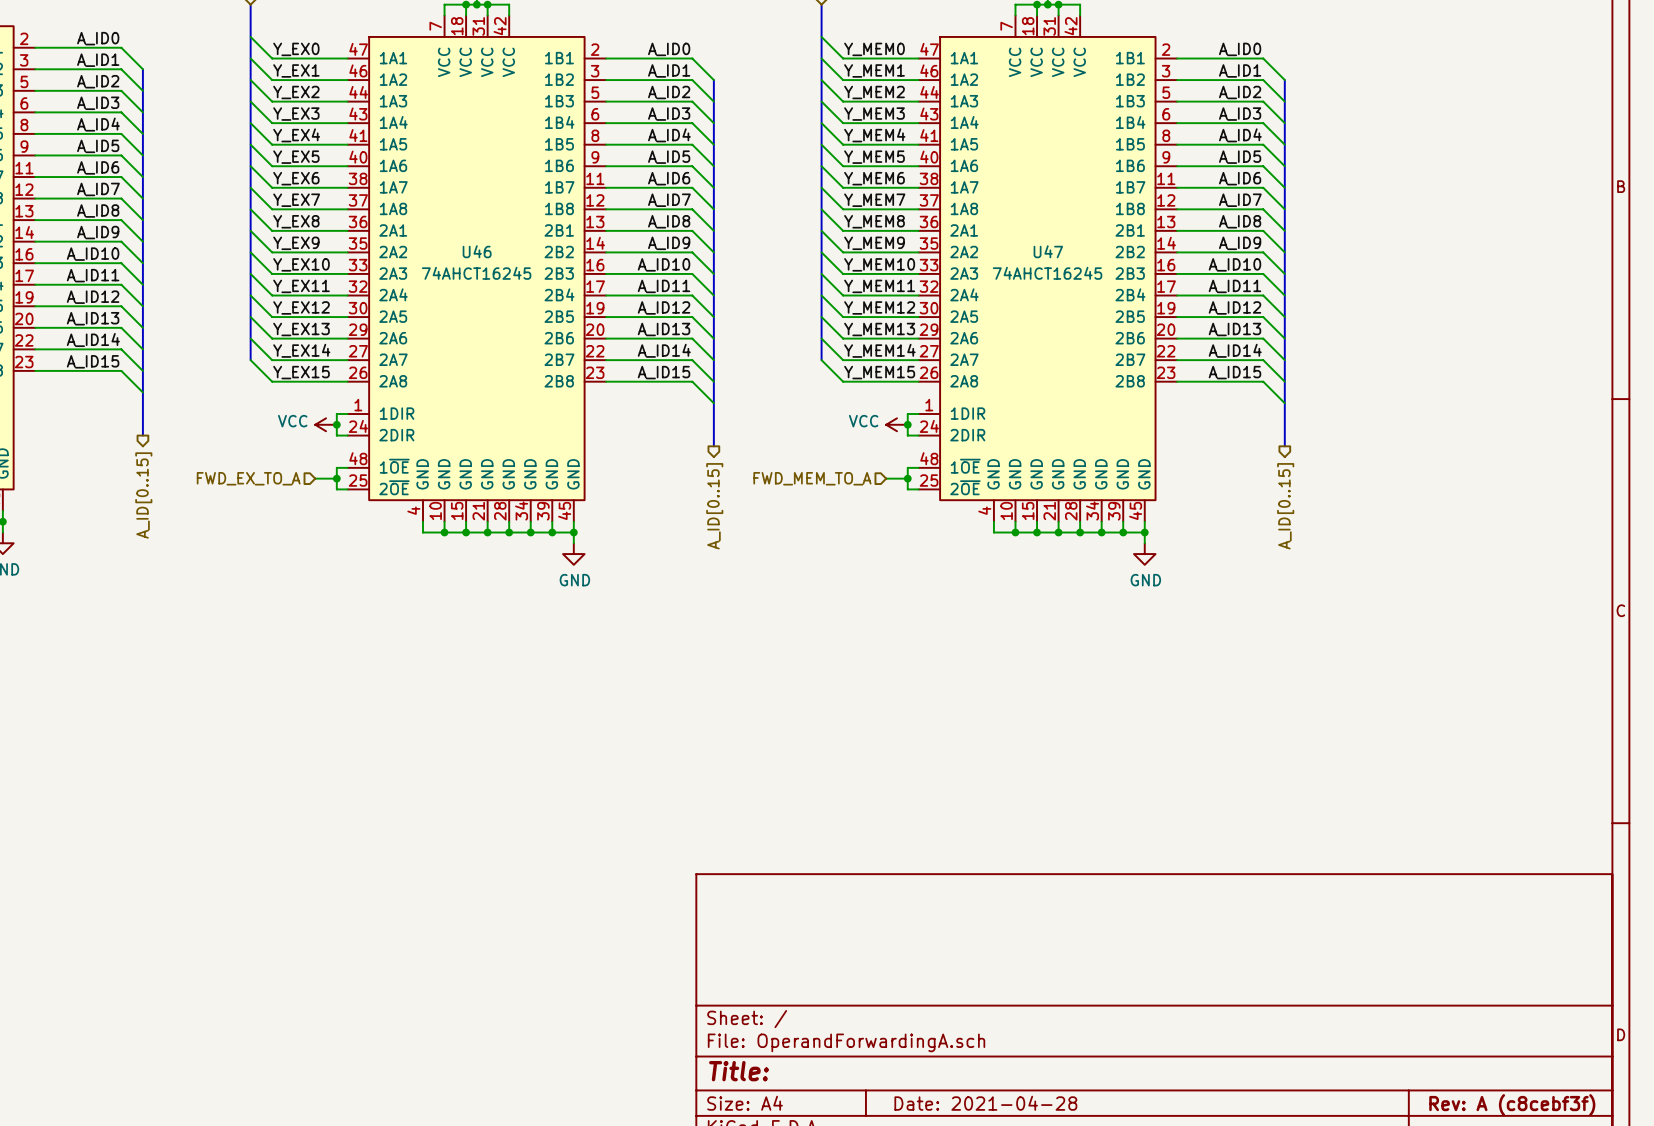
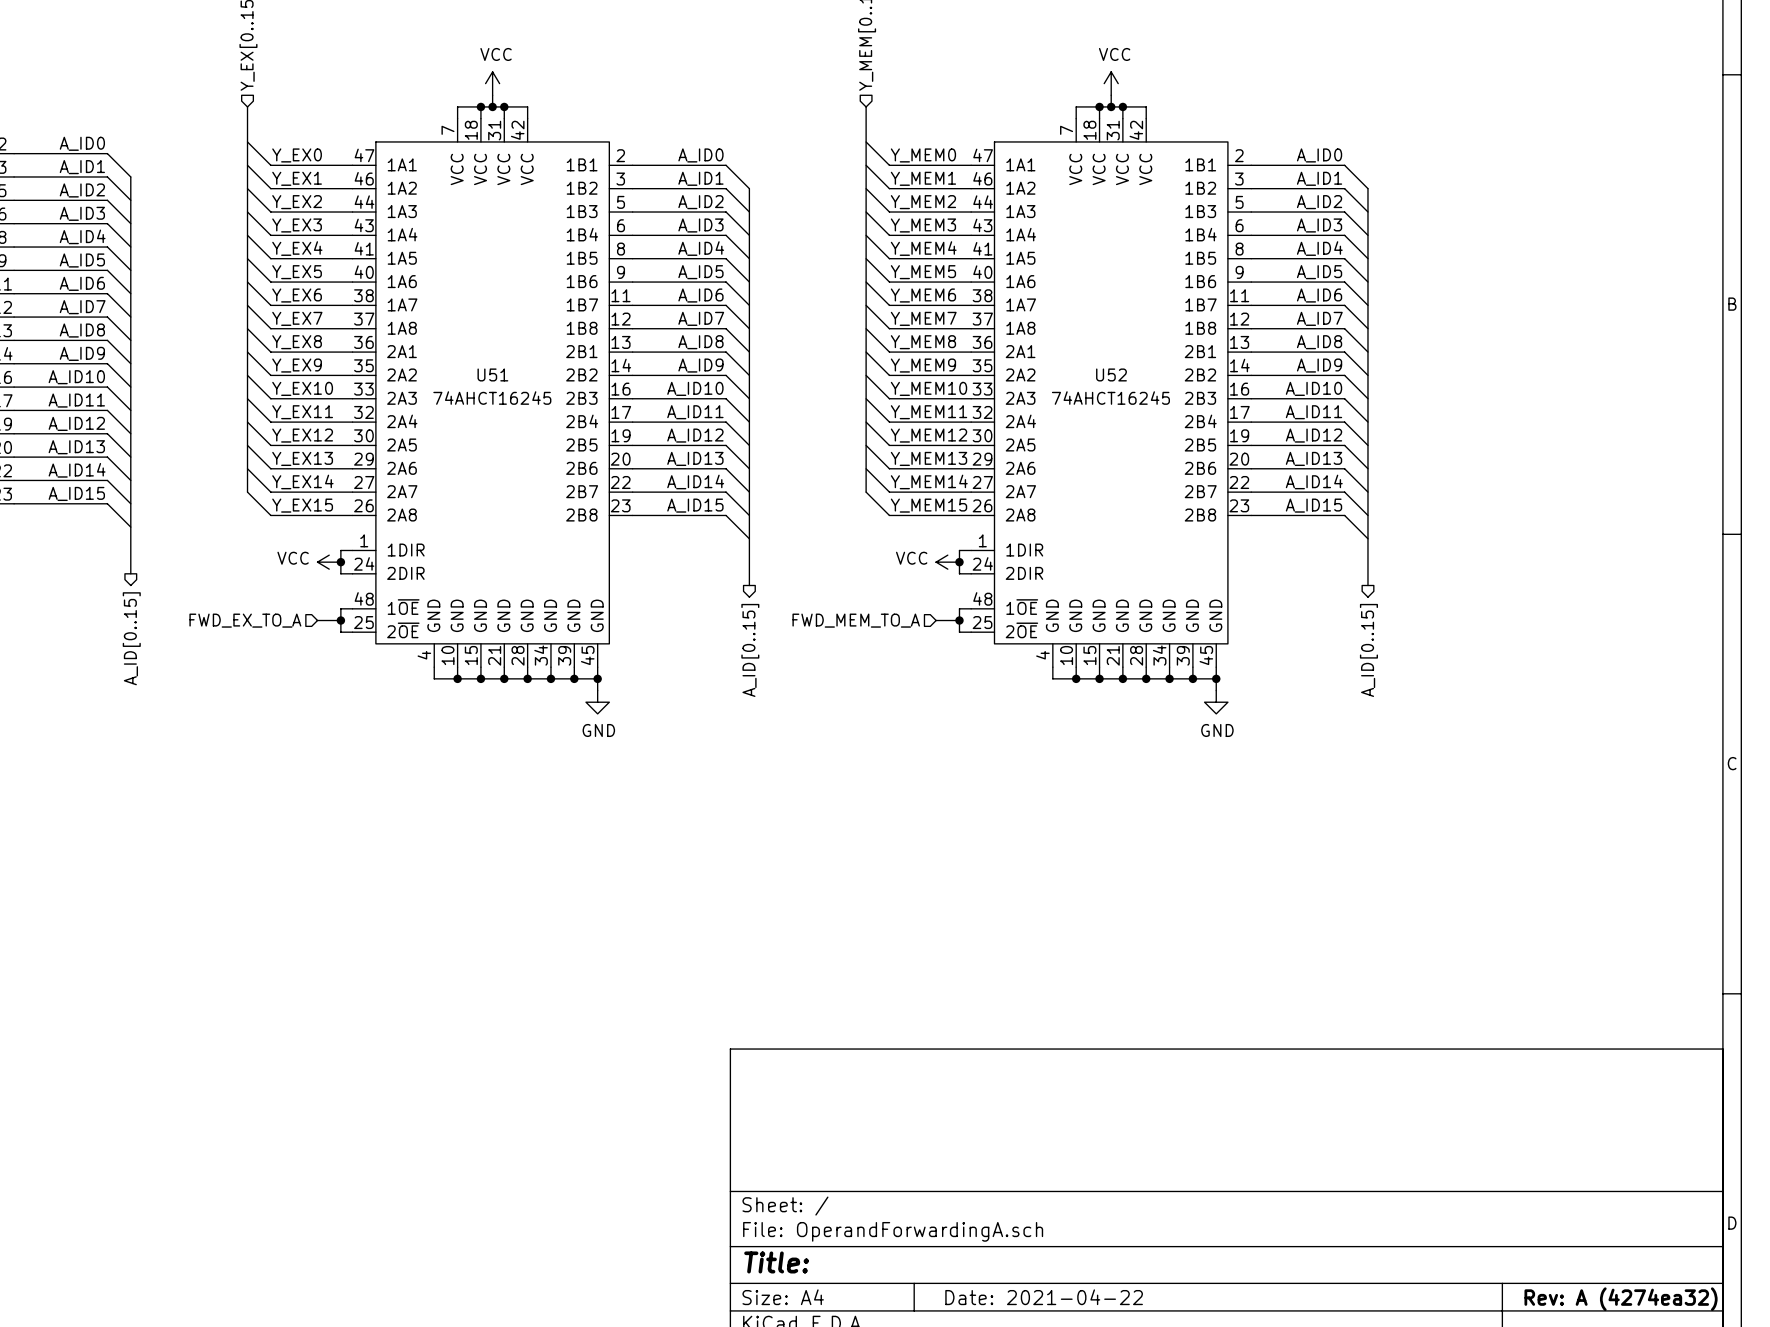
U46 name: U46 (477, 251) -> U51 (492, 374)
U47 name: U47 (1048, 251) -> U52 (1111, 374)
title block: Date: 2021-04-28 (985, 1103) -> Date: 2021-04-22 (1044, 1297)
title block: Rev: A (c8cebf3f) (1512, 1105) -> Rev: A (4274ea32) (1621, 1299)

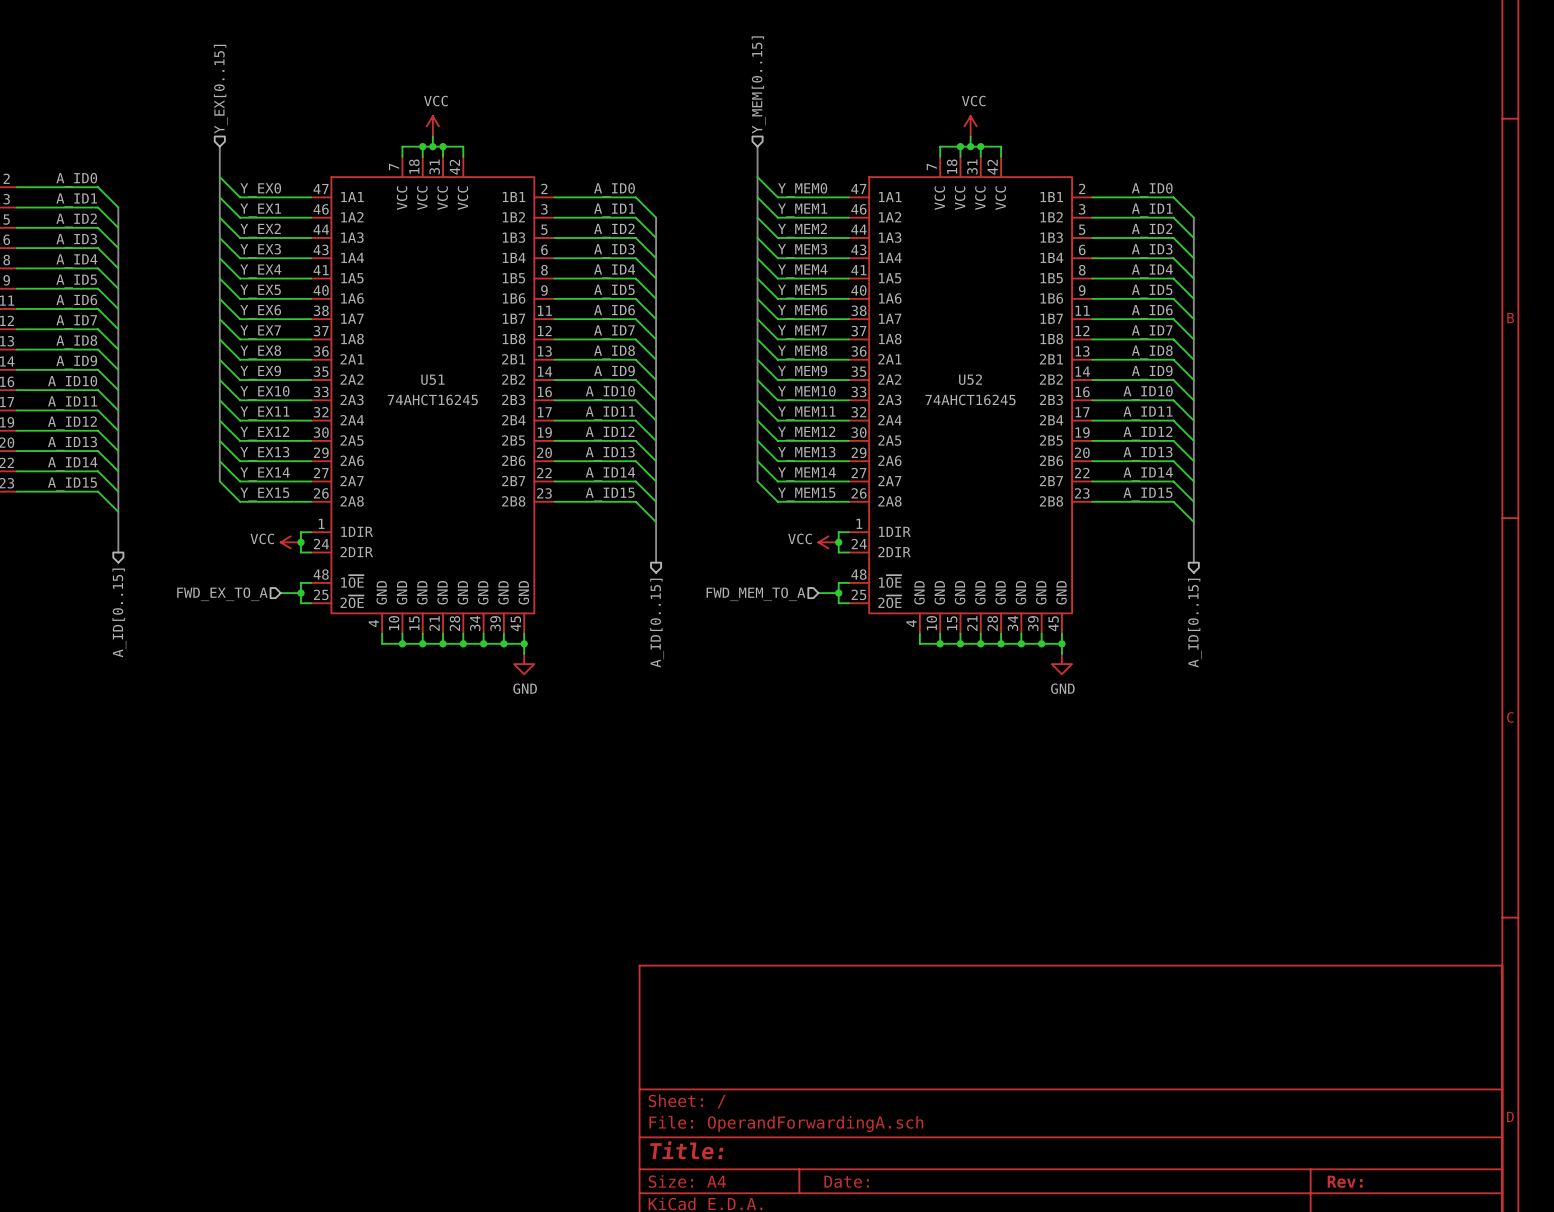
title block: Date: 2021-04-22 (1044, 1297) -> Date: (846, 1181)
title block: Rev: A (4274ea32) (1621, 1299) -> Rev: (1345, 1181)

